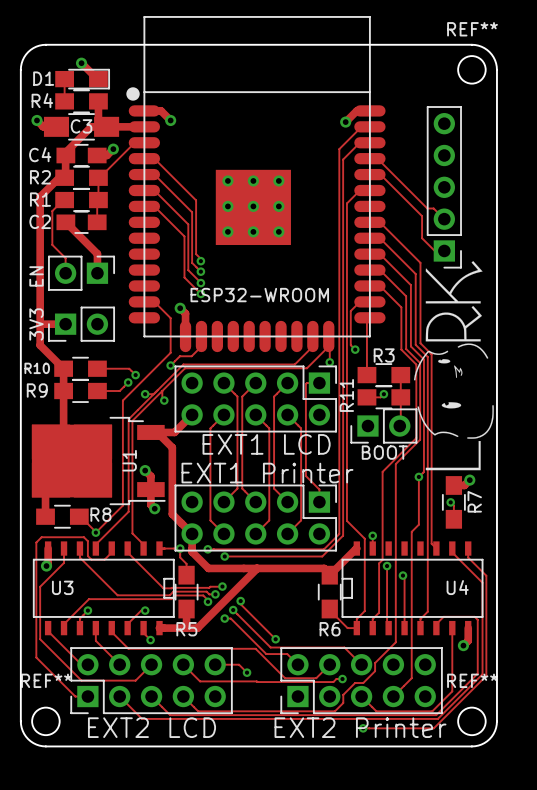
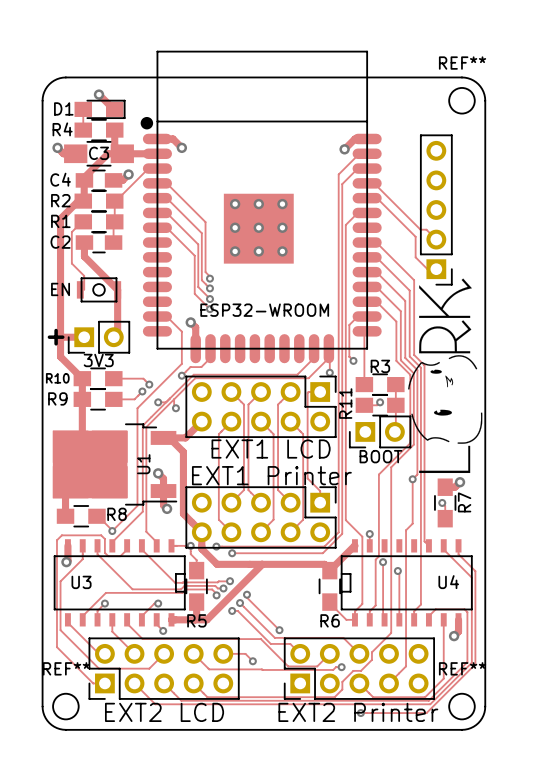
track: (65, 222) (97, 253) (97, 273) -> (84, 242) (84, 256) (117, 289) (117, 333) (113, 337)
part footprint: [48, 255, 115, 291] -> [76, 277, 122, 303]
text: none -> + (56, 337)
part value rotation: 0° (36, 324) -> 90° clockwise (98, 360)
part value position: 3V3 (36, 324) -> 3V3 (98, 360)

